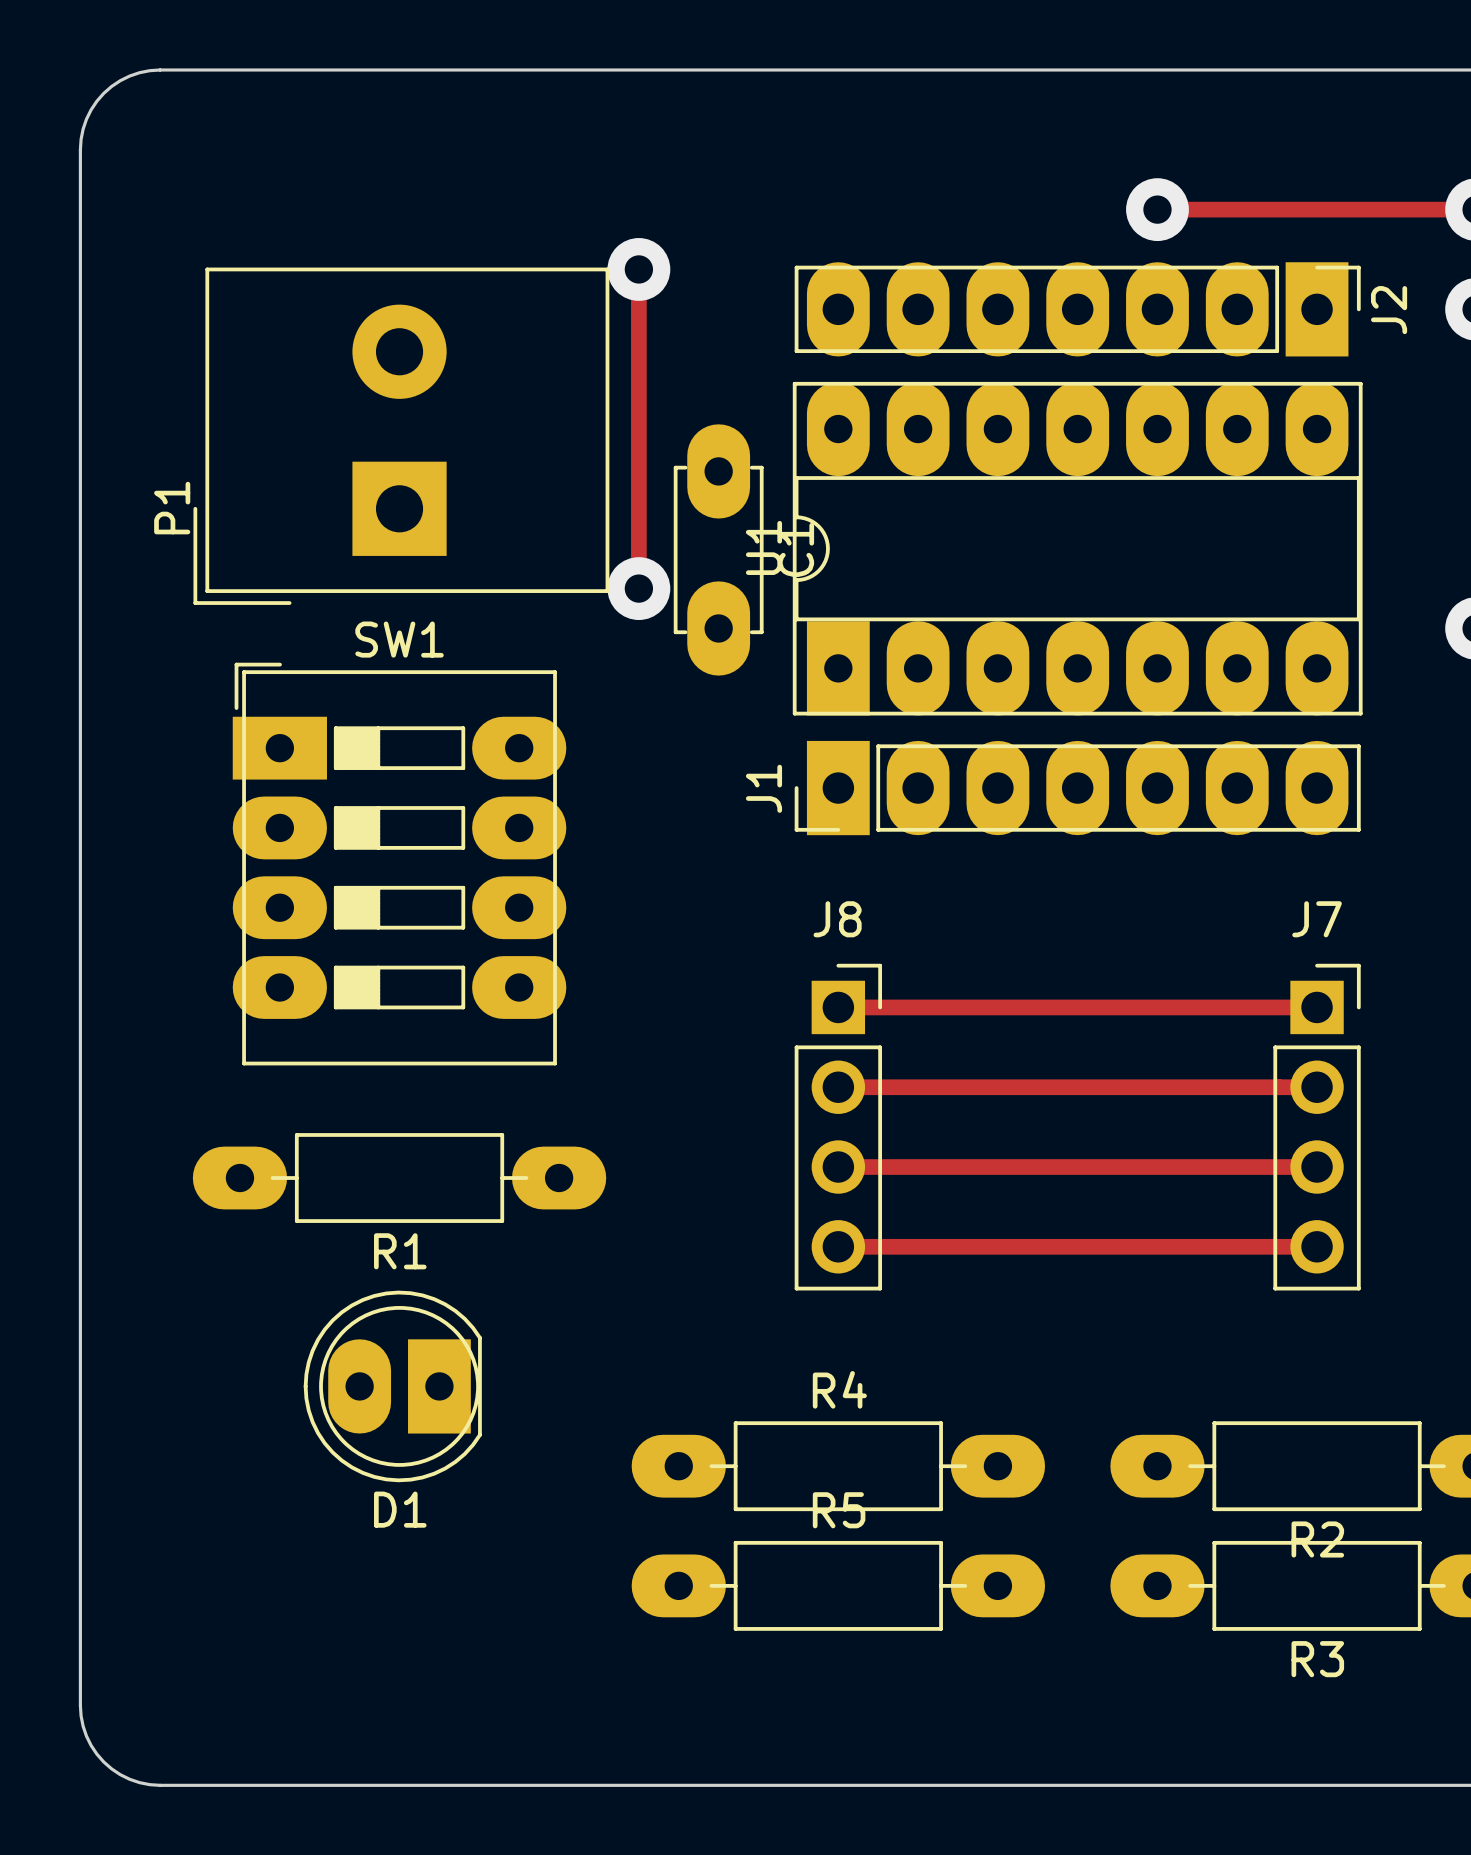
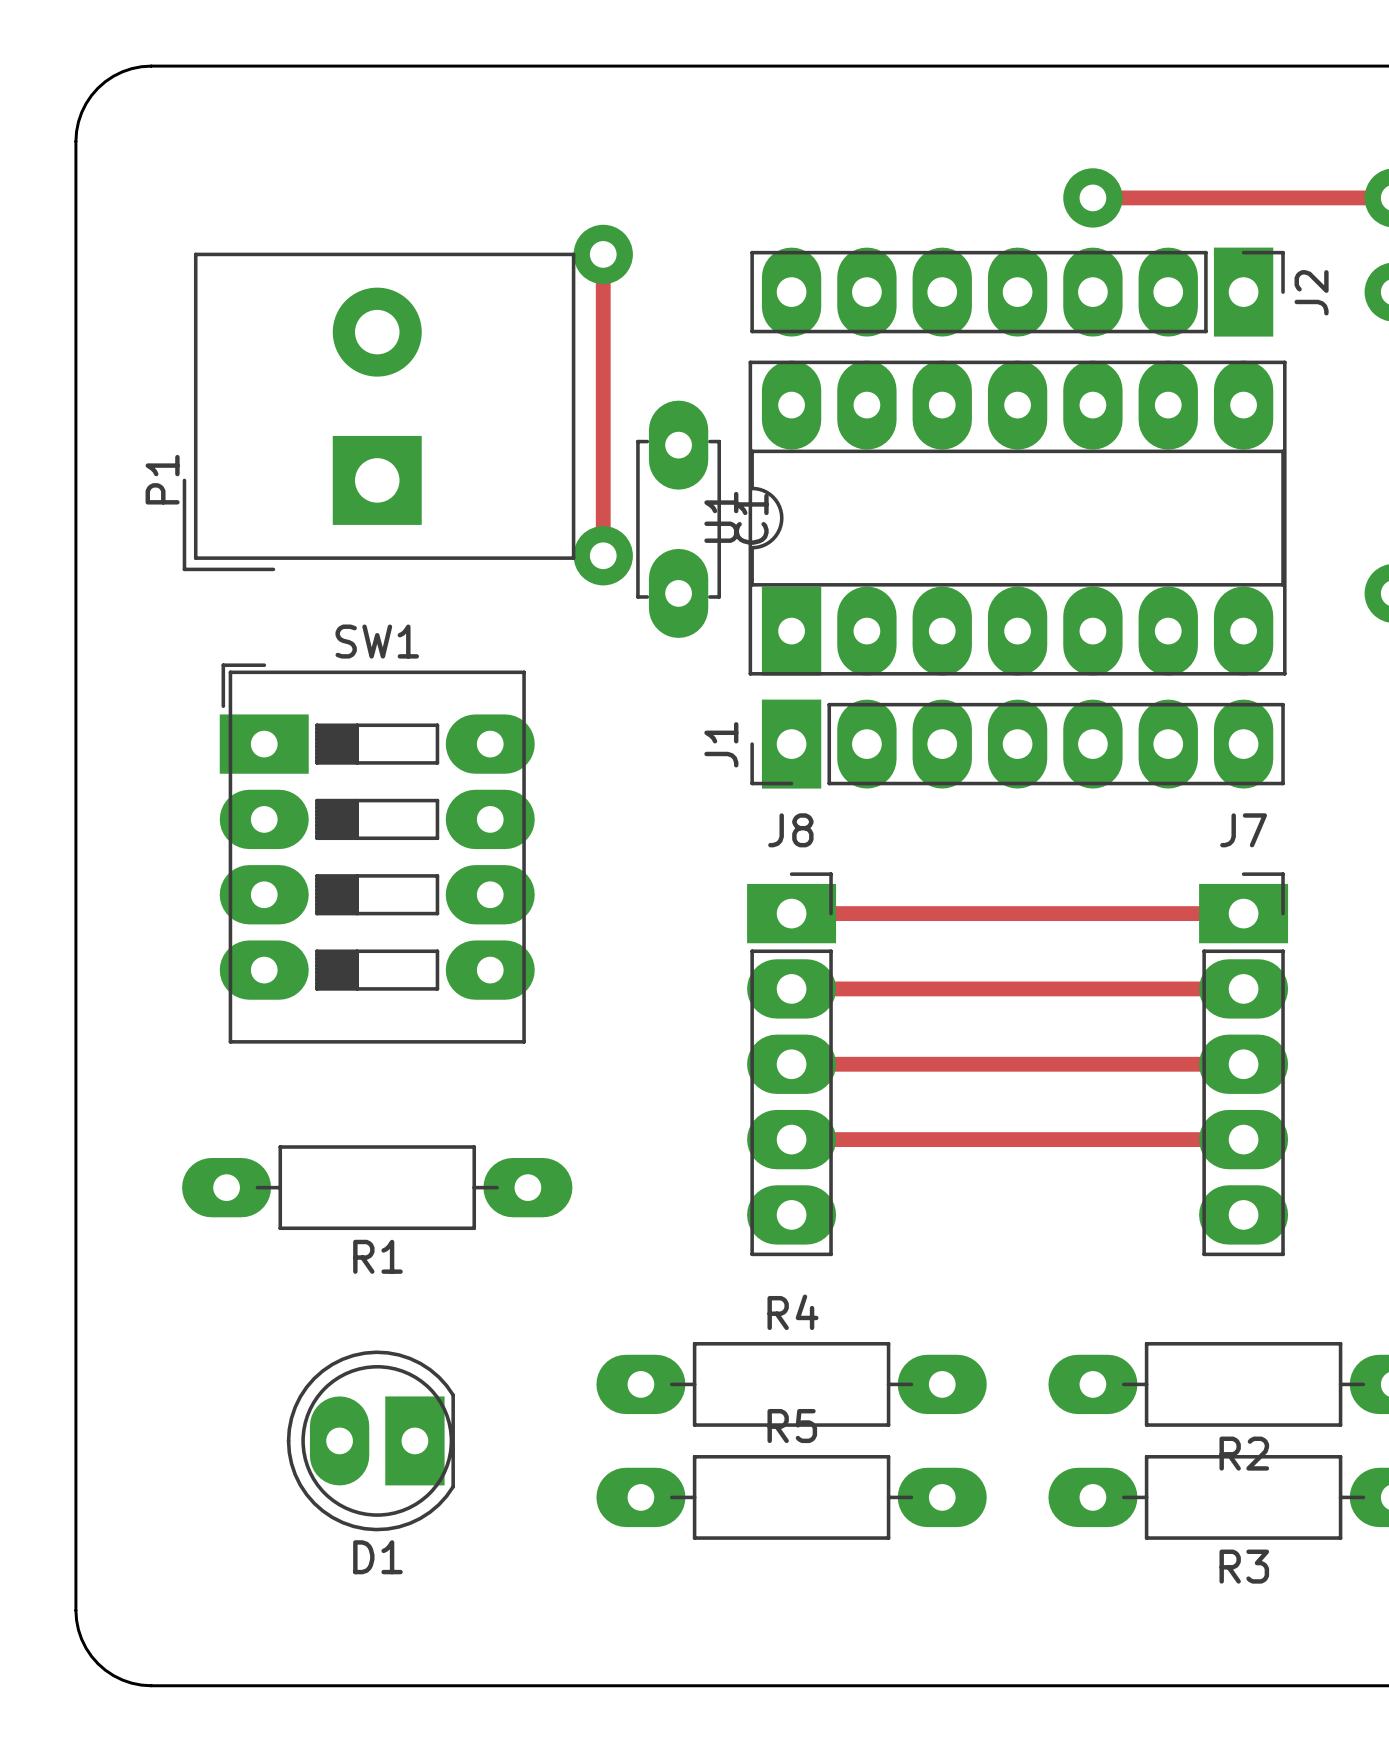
SW1 position: (399, 864) -> (377, 853)
J8 footprint: [794, 963, 883, 1291] -> [747, 872, 837, 1257]
J7 footprint: [1273, 963, 1361, 1291] -> [1199, 872, 1289, 1257]
track: (838, 1007) (1317, 1007) -> (791, 913) (1243, 913)
track: (838, 1087) (1317, 1087) -> (791, 988) (1243, 988)
track: (838, 1167) (1317, 1167) -> (791, 1064) (1243, 1064)
R1 position: (399, 1178) -> (377, 1187)
track: (838, 1246) (1317, 1246) -> (791, 1139) (1243, 1139)
D1 footprint: [303, 1290, 482, 1483] -> [286, 1350, 455, 1532]

